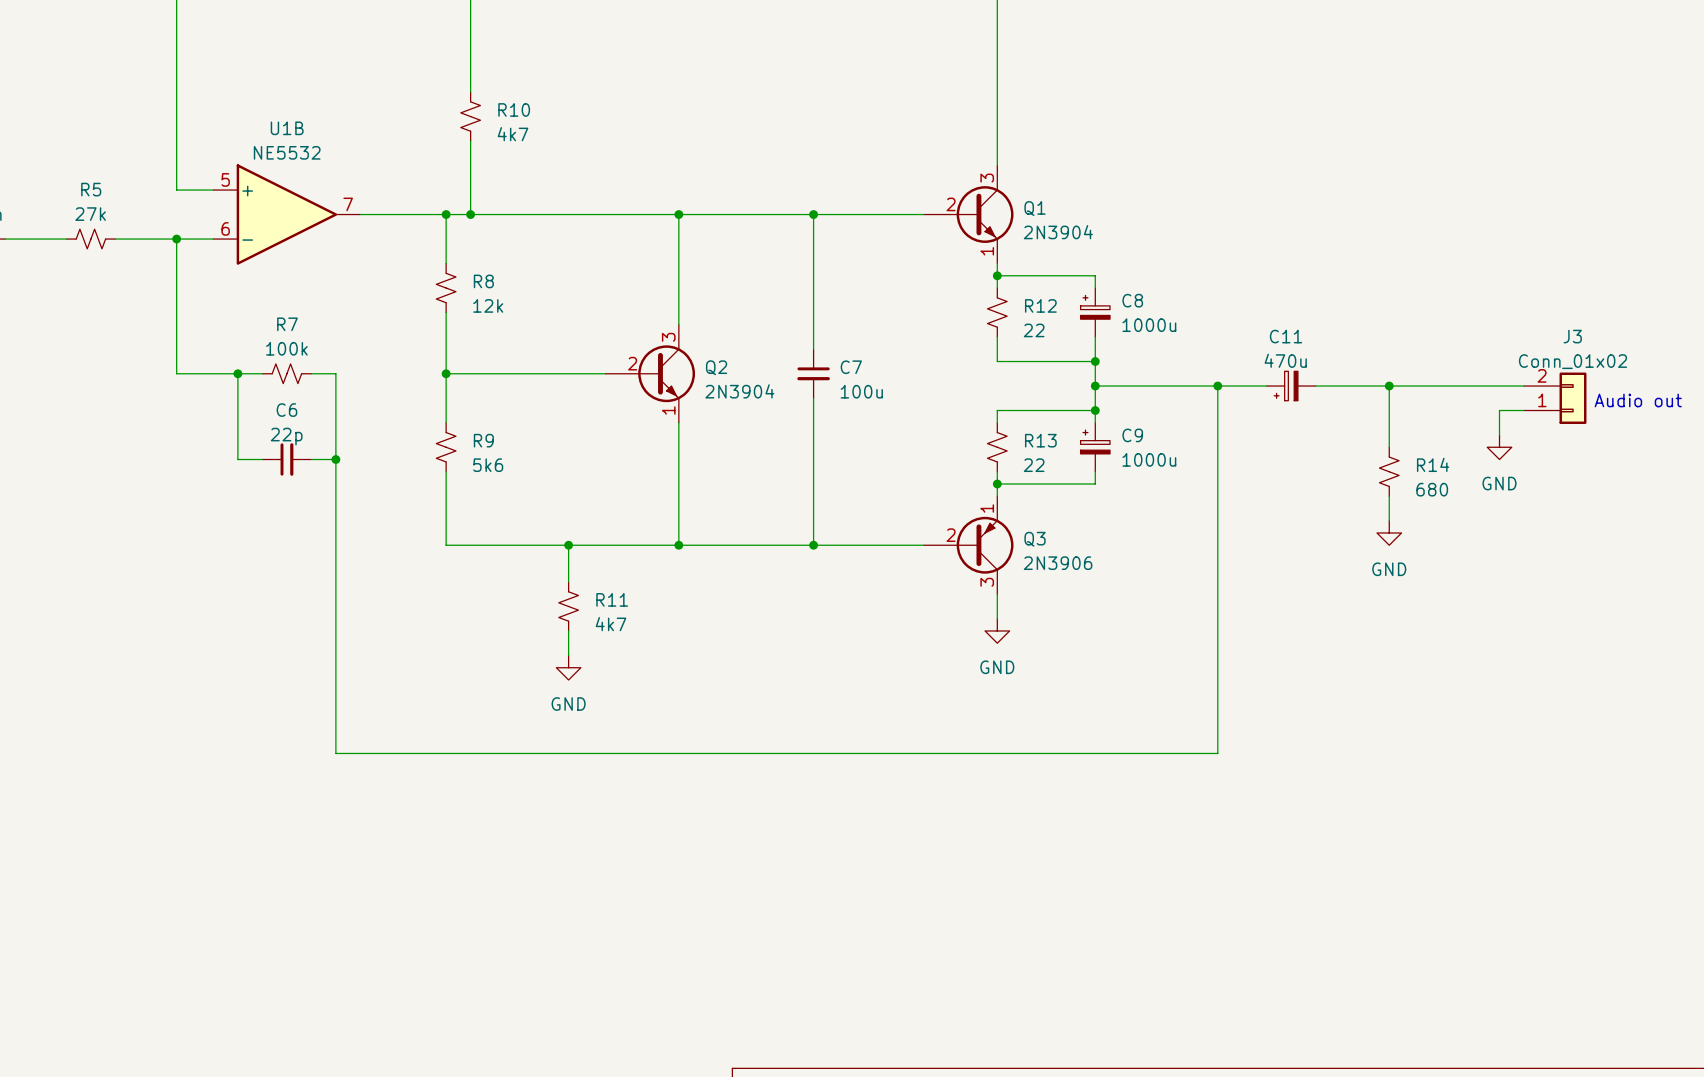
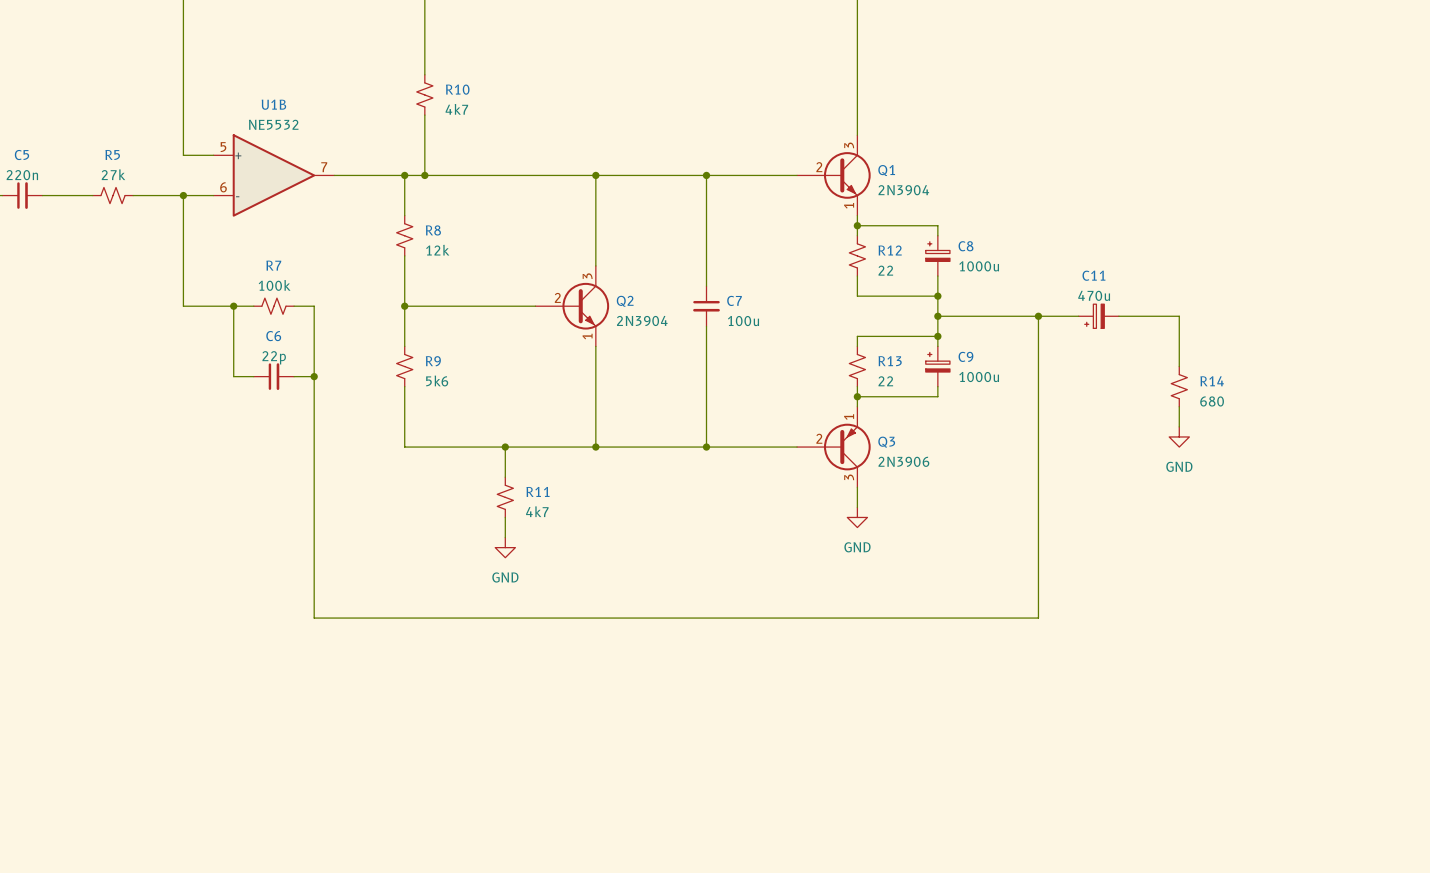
wire: (1389, 386) (1524, 386) -> none
junction: (1389, 386) -> none
J3: Conn_01x02 (1555, 398) -> none
text: Audio out (1638, 400) -> none
wire: (1524, 410) (1499, 410) (1499, 435) -> none
power symbol: GND (1499, 447) -> none

